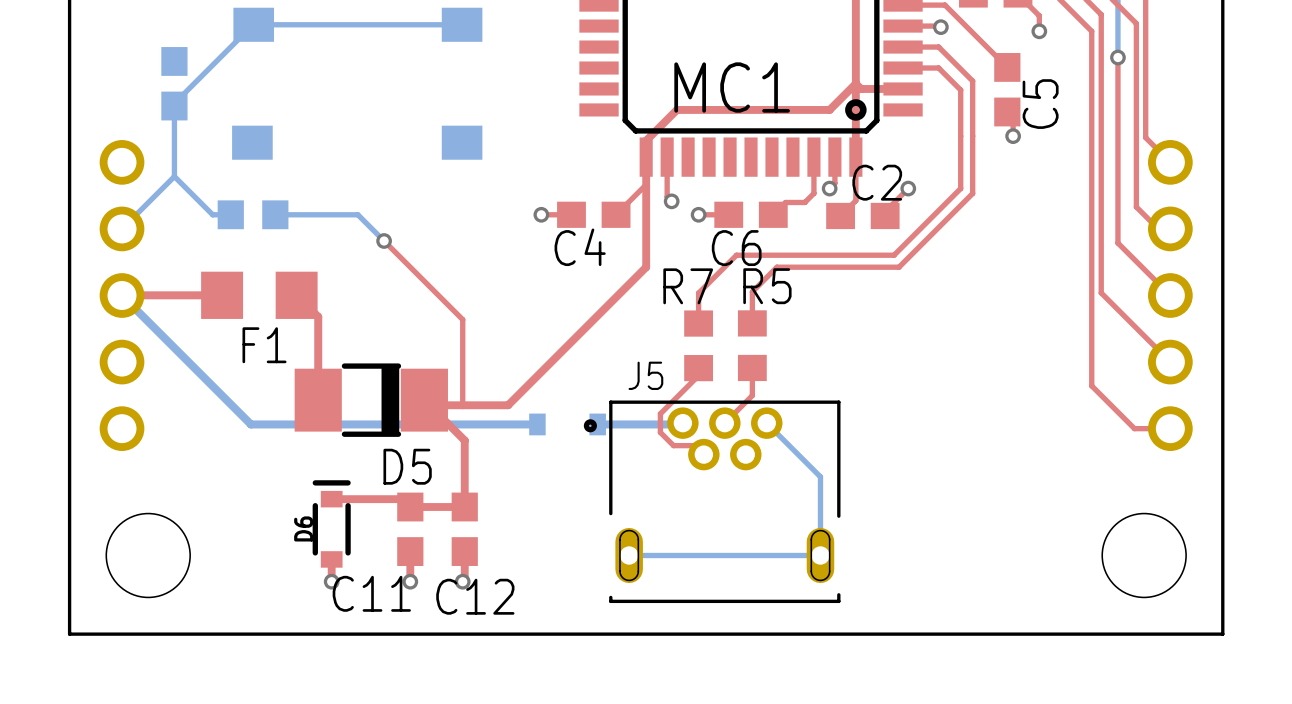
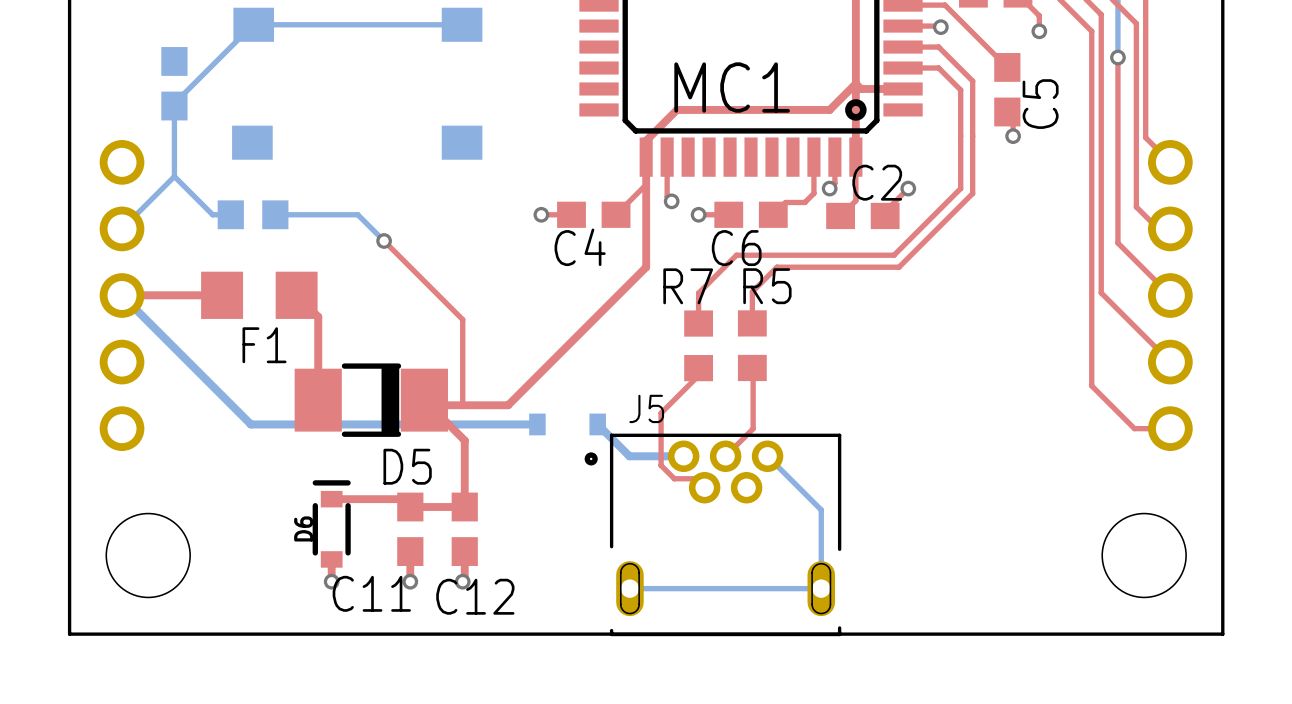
top track: (752, 367) (752, 395) (724, 423) -> (752, 367) (753, 428) (725, 456)
top track: (661, 413) (660, 432) (673, 445) (694, 445) (703, 454) -> (661, 413) (661, 465) (674, 478) (695, 478) (704, 487)
bottom track: (682, 423) (597, 424) -> (683, 456) (629, 456) (597, 424)
bottom track: (766, 423) (820, 476) (820, 555) (629, 555) -> (767, 456) (821, 510) (821, 588) (629, 588)
J5 position: (712, 501) -> (712, 534)

